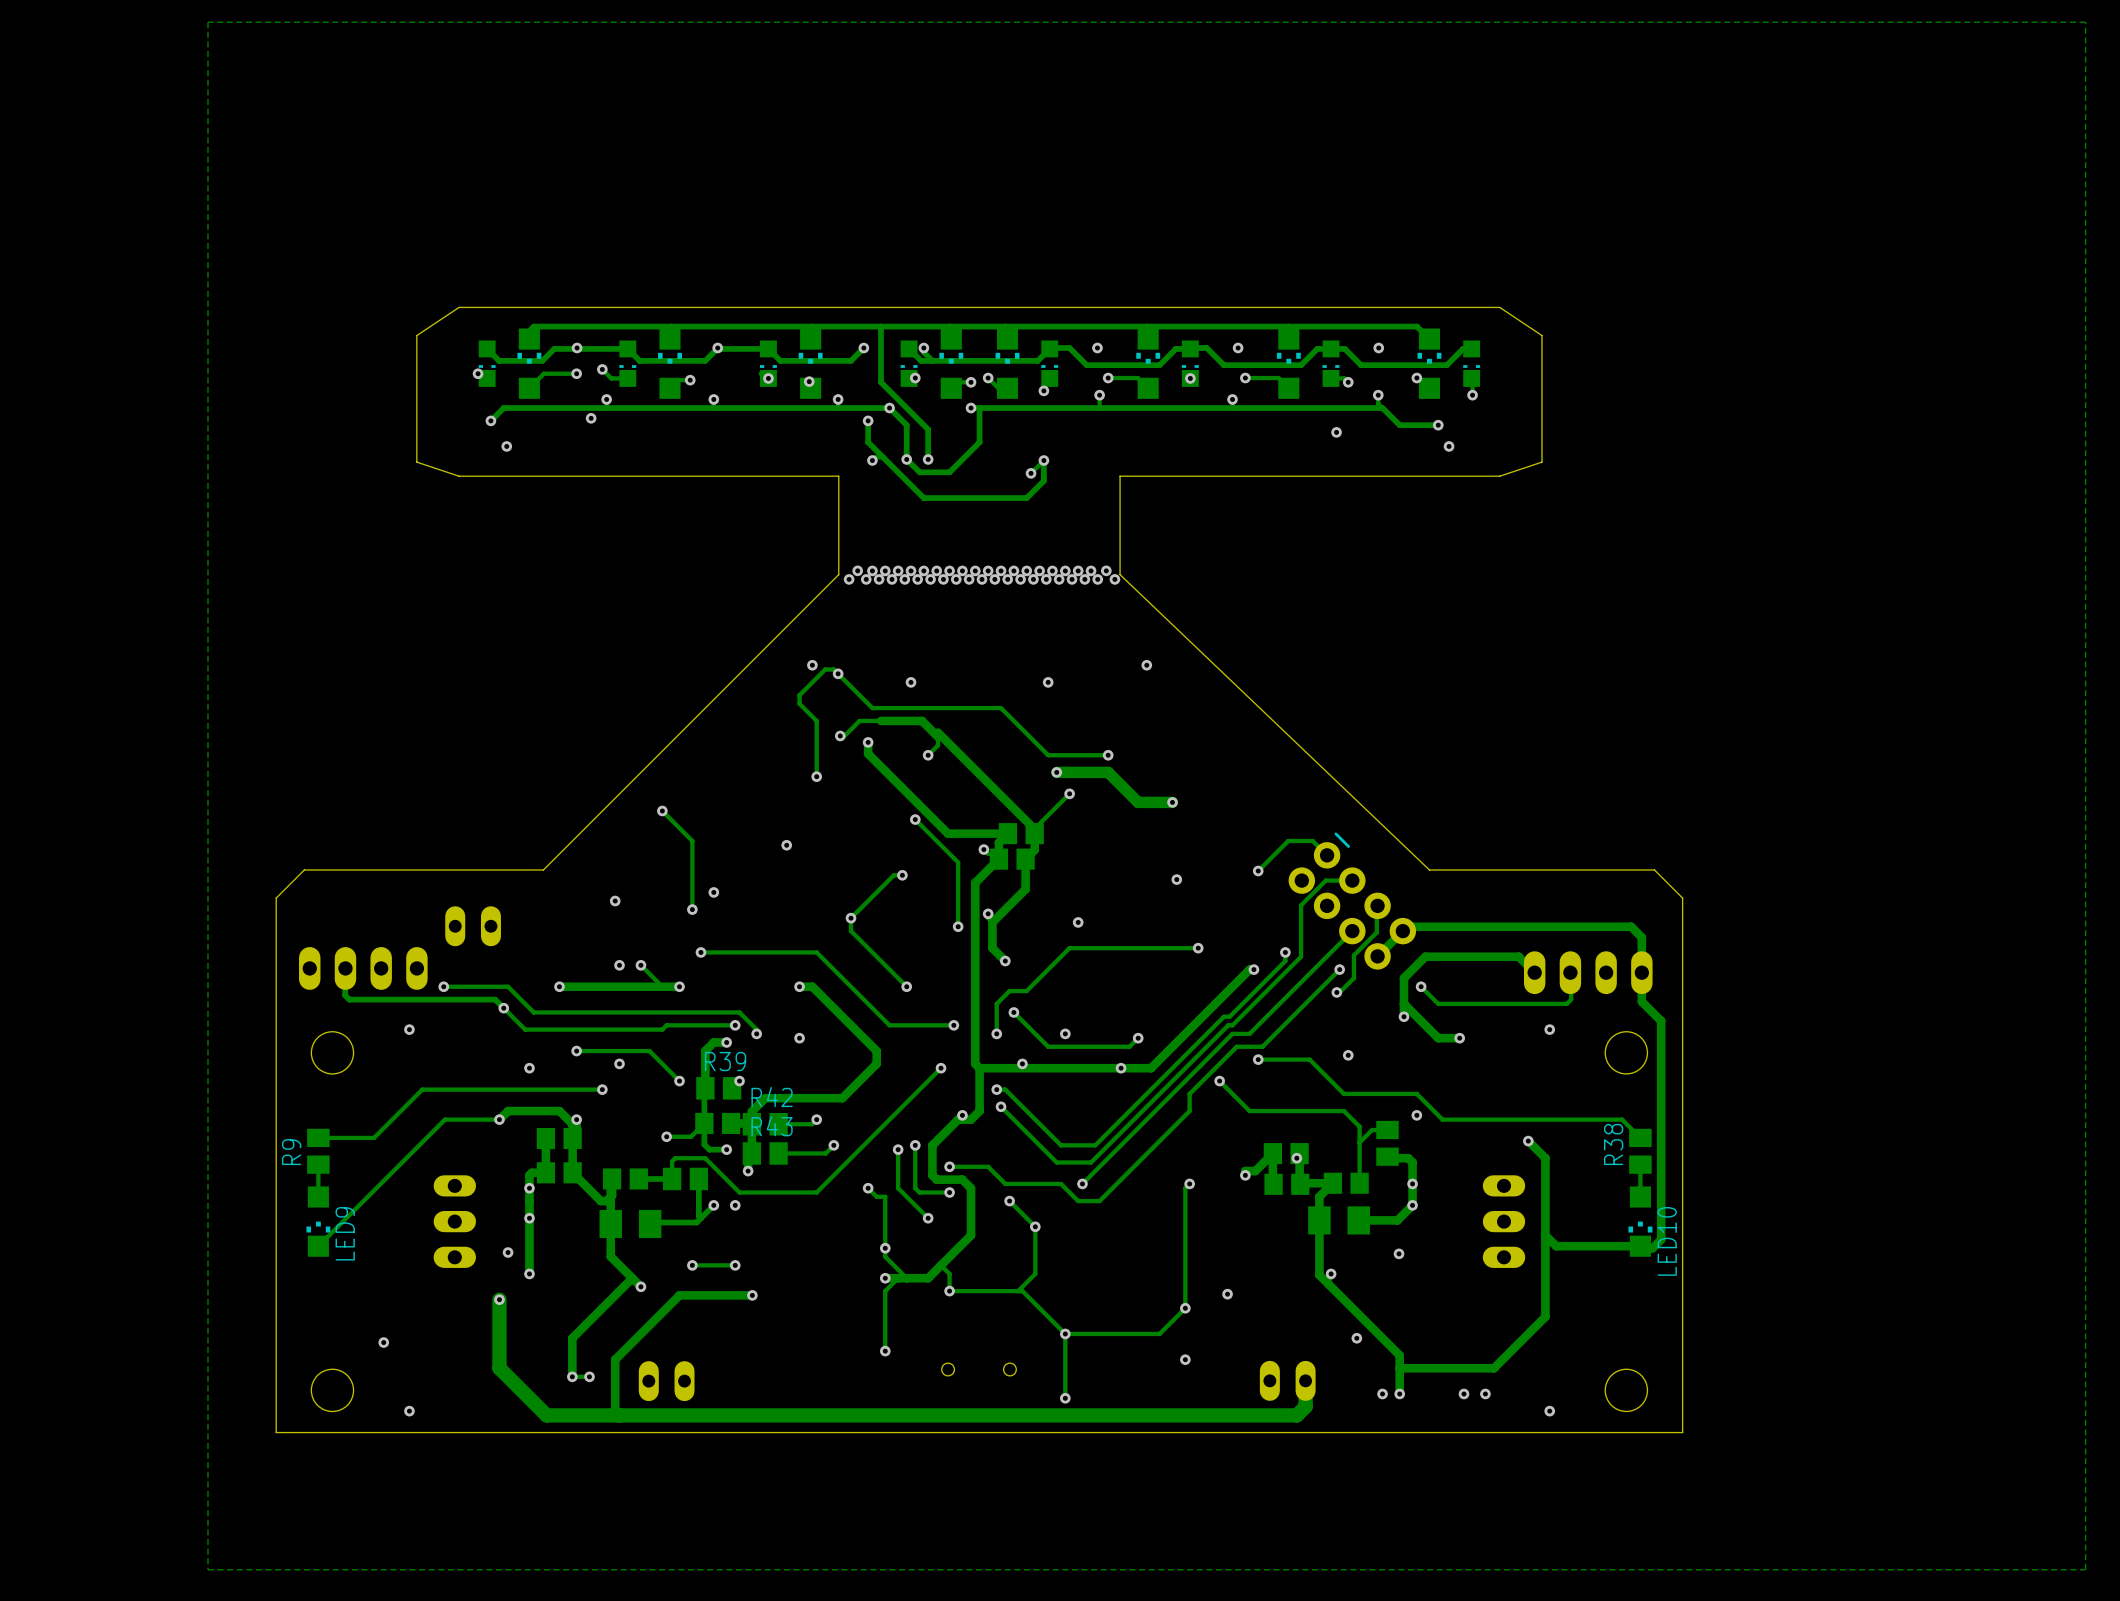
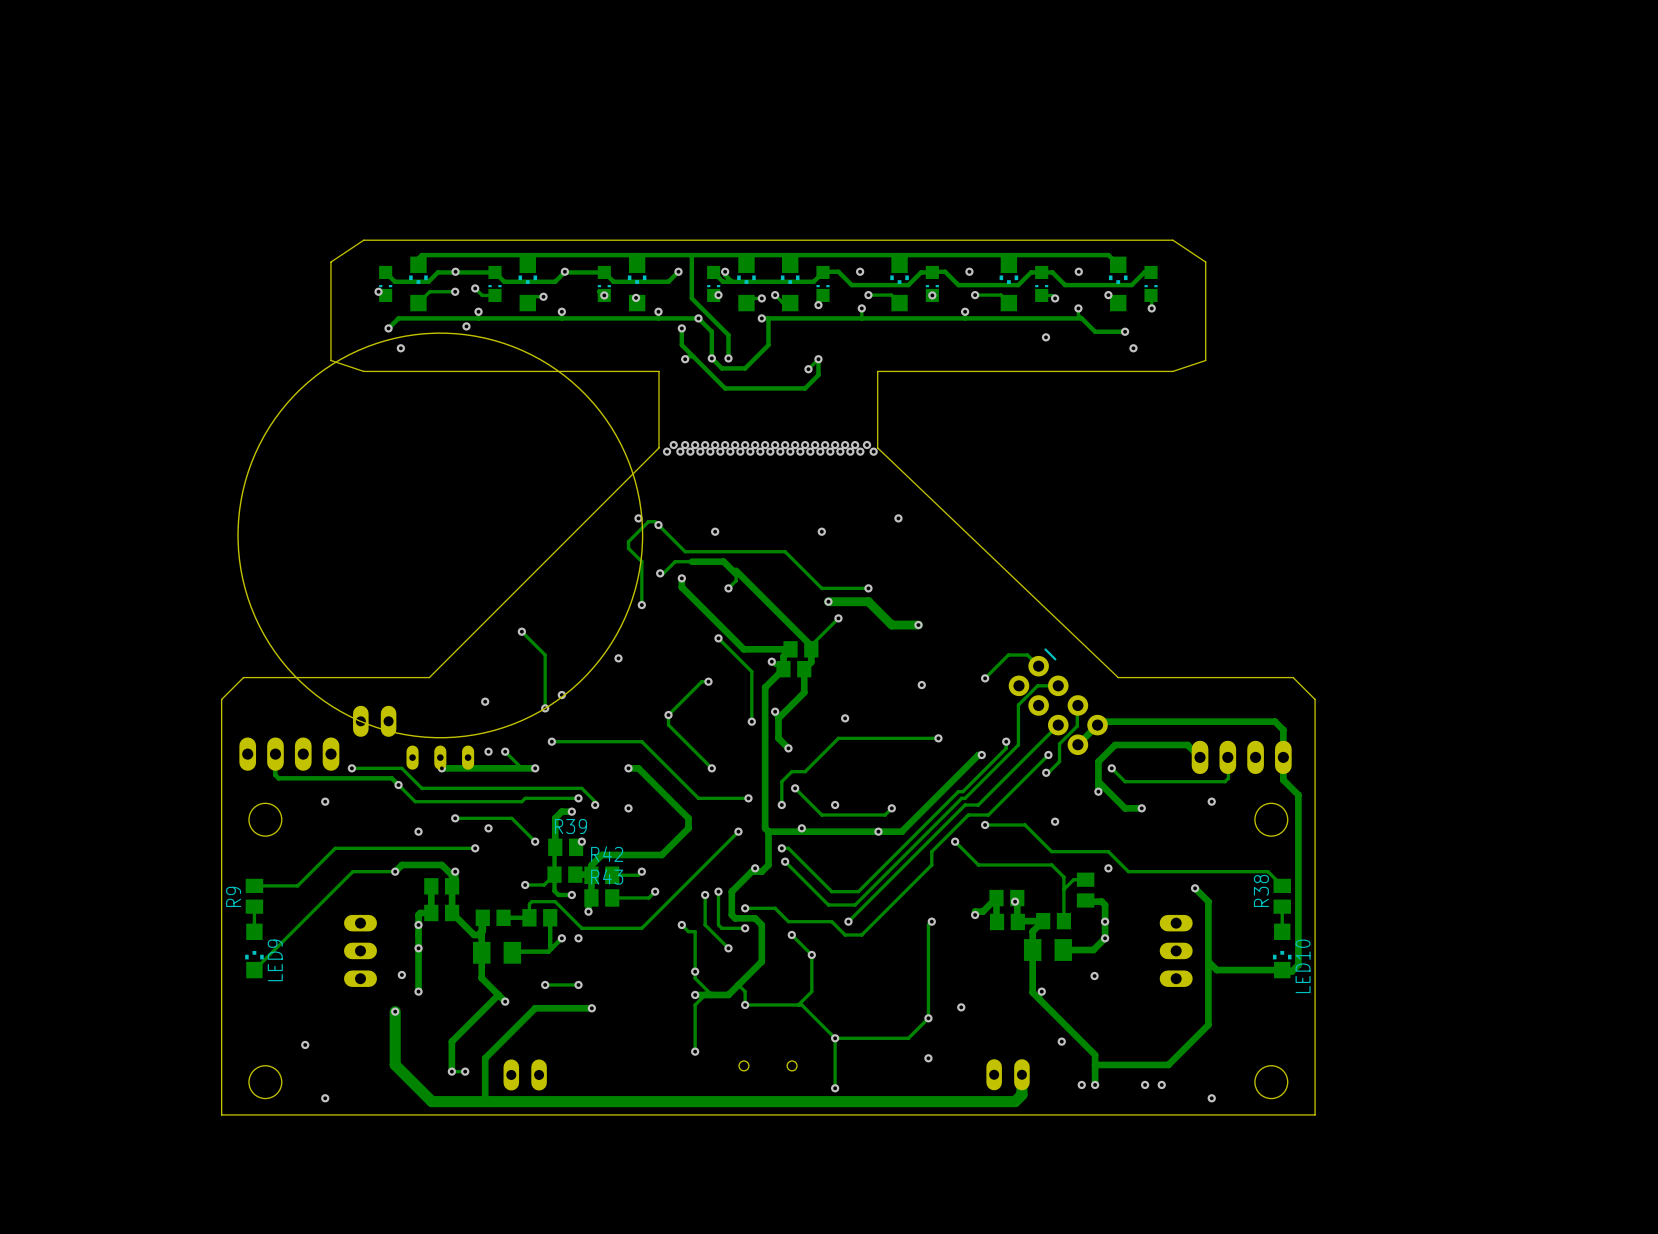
zone outline: (2085, 22) (207, 22) (207, 1569) (2085, 1569) (2085, 22) -> none
part: none -> (440, 551)

